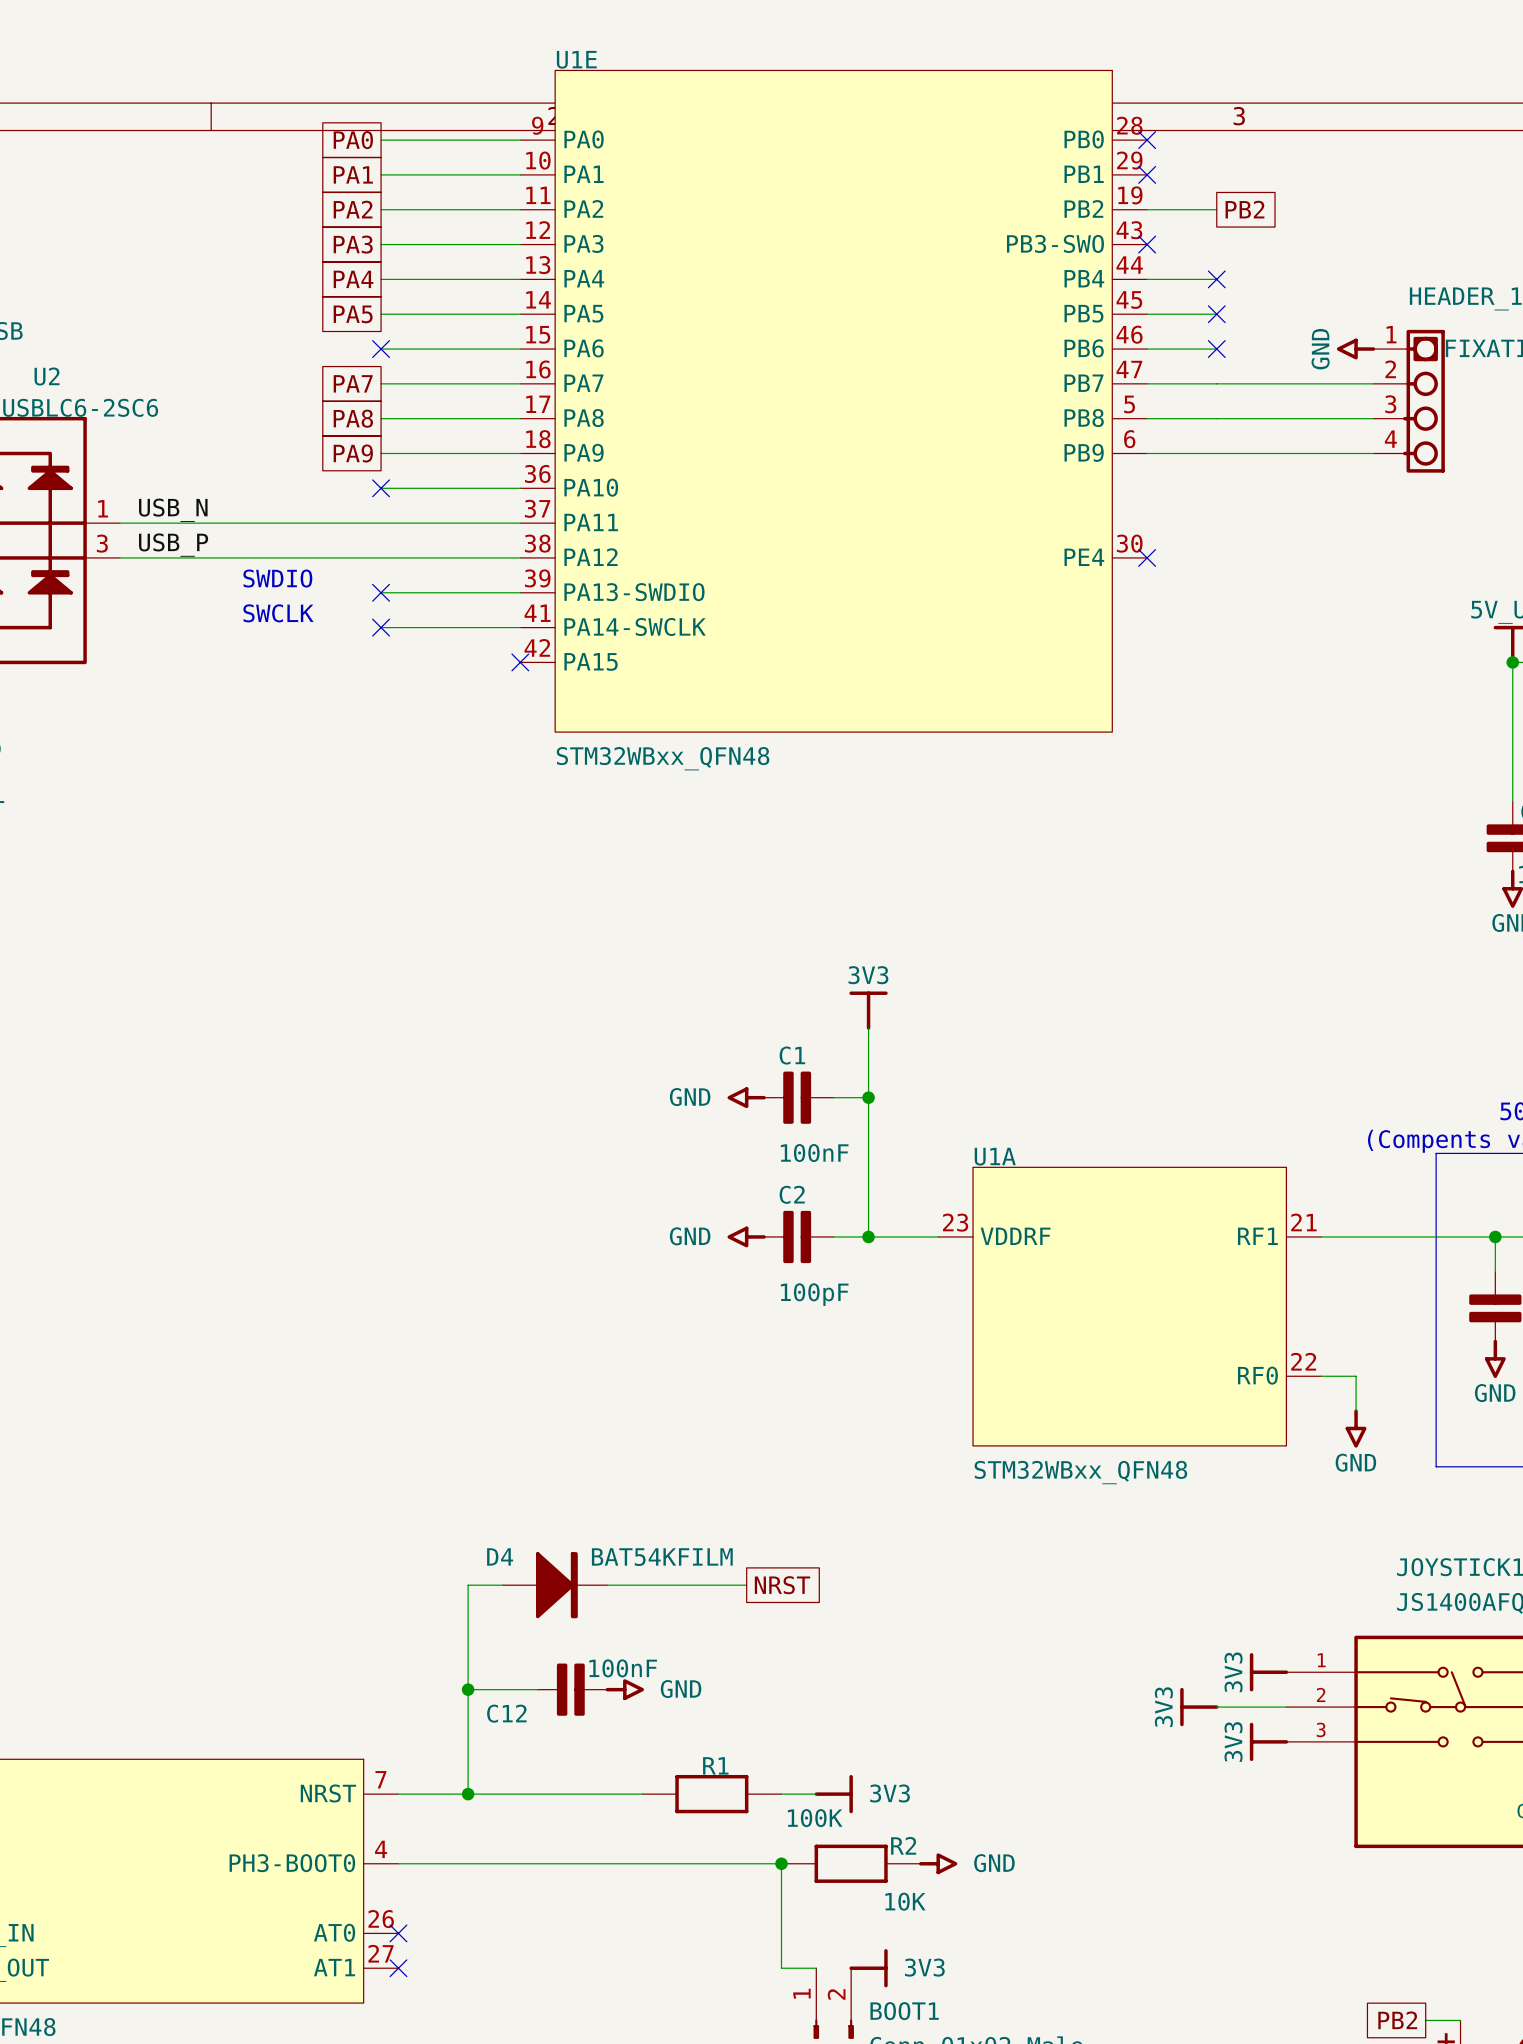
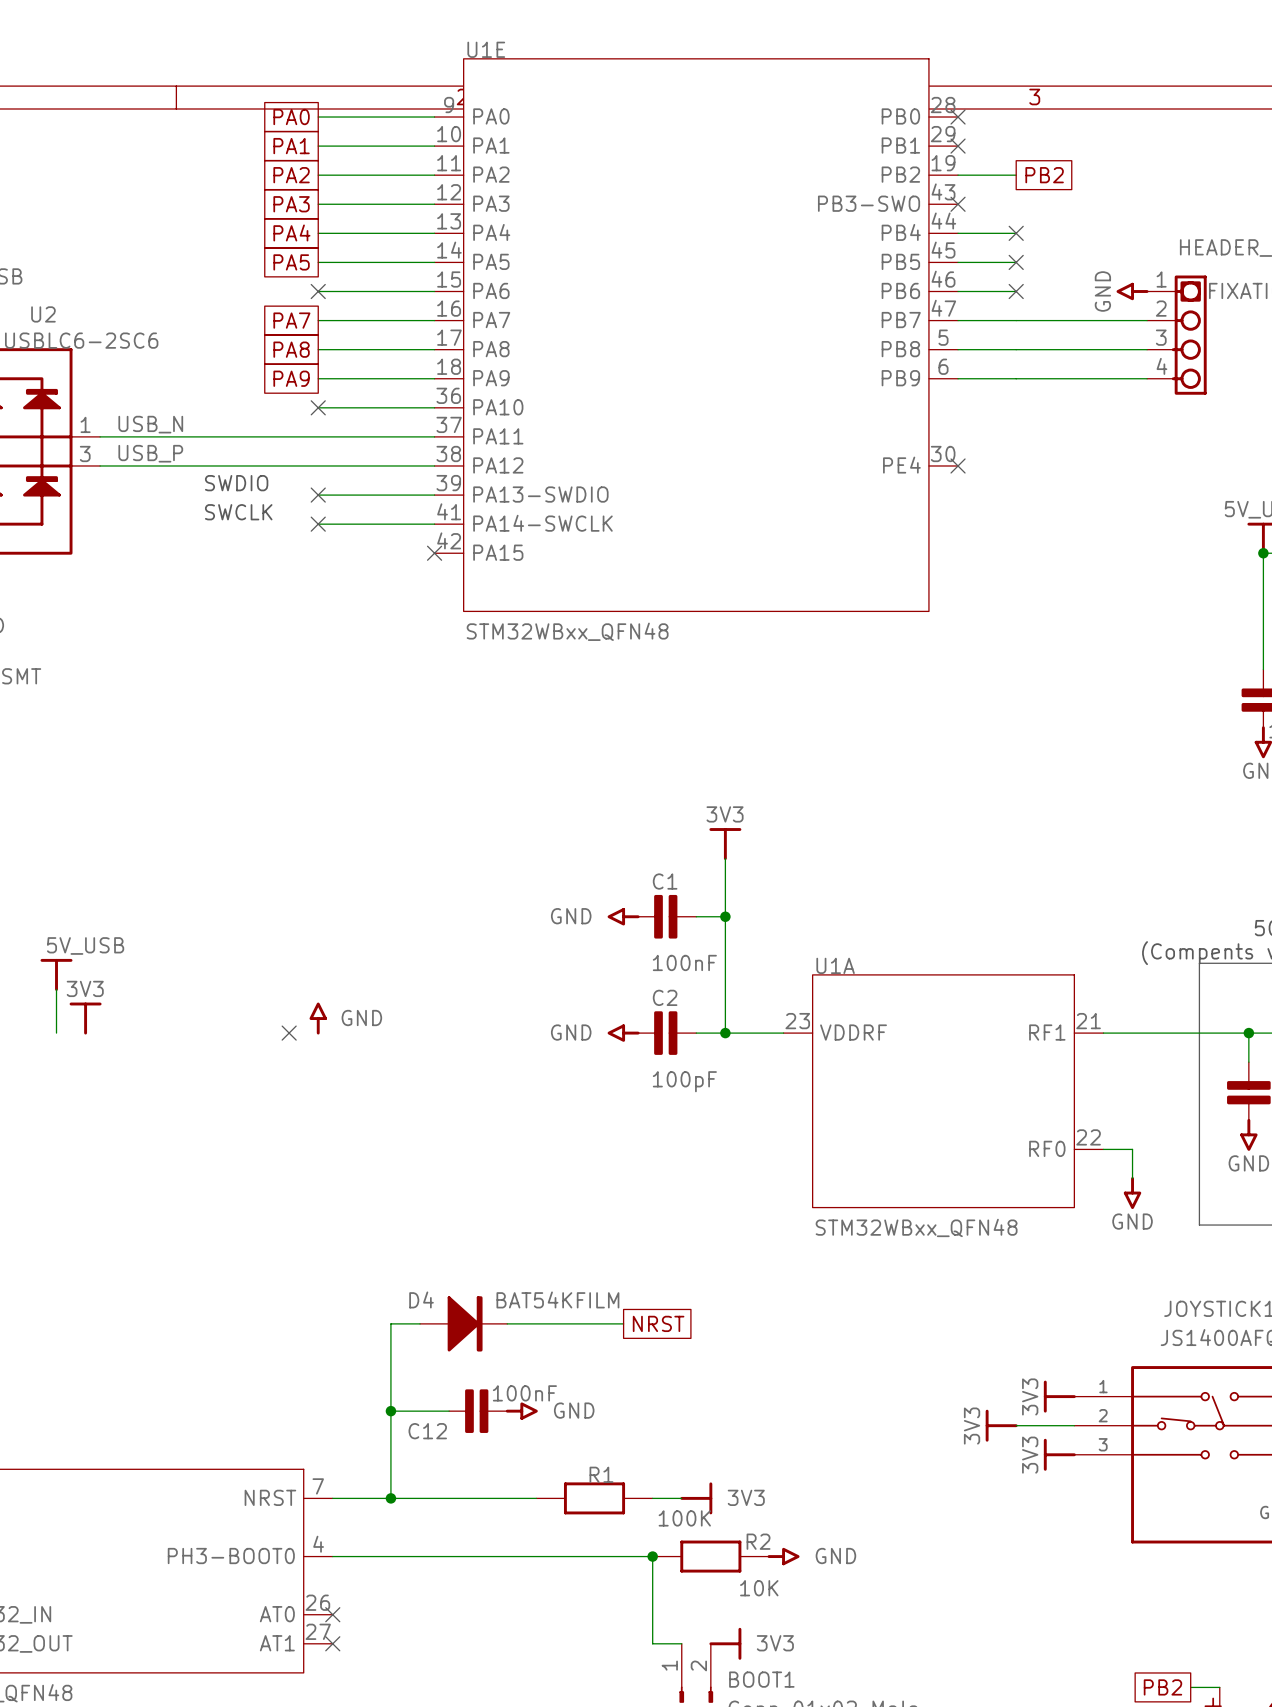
power symbol: none -> 5V_USB (56, 974)
wire: none -> (56, 989) (56, 1033)
power symbol: none -> 3V3 (85, 1018)
power symbol: none -> GND (318, 1018)
no-connect mark: none -> (289, 1033)

